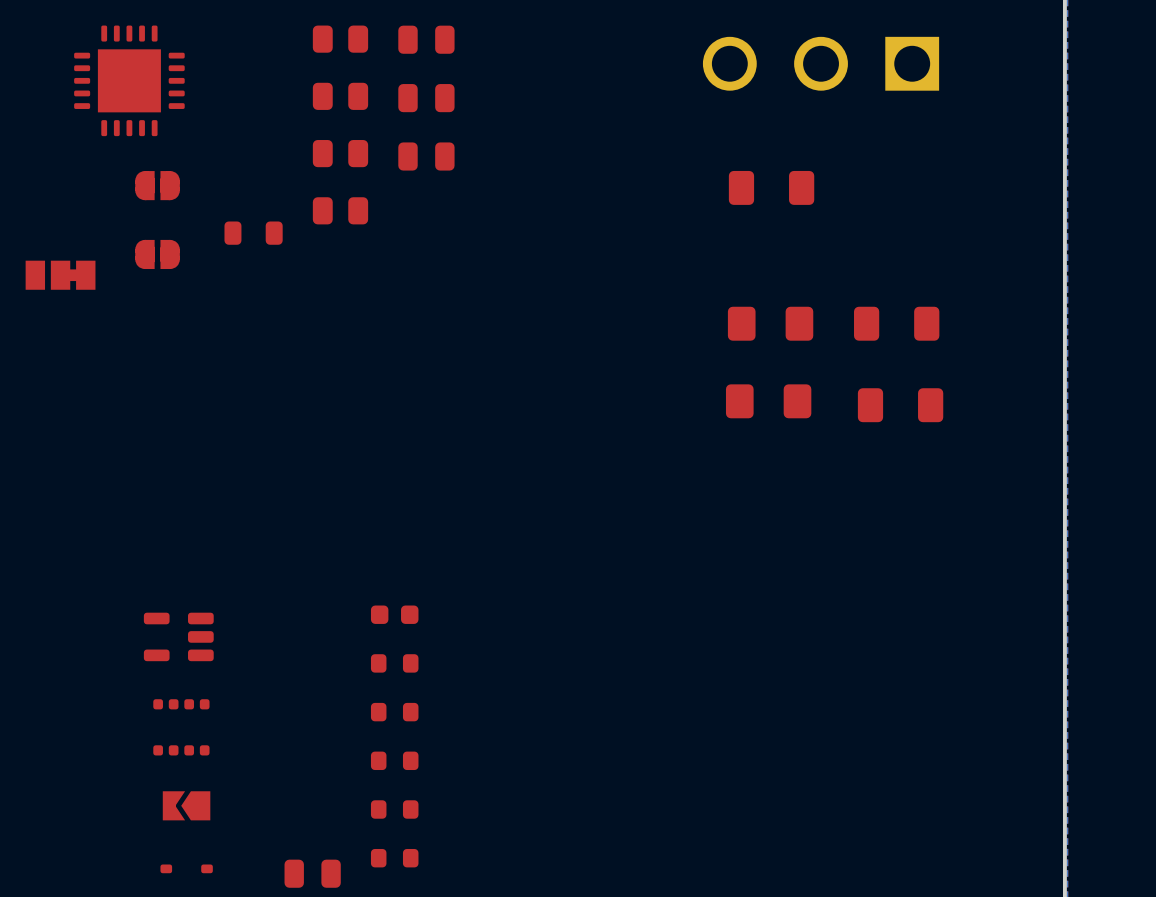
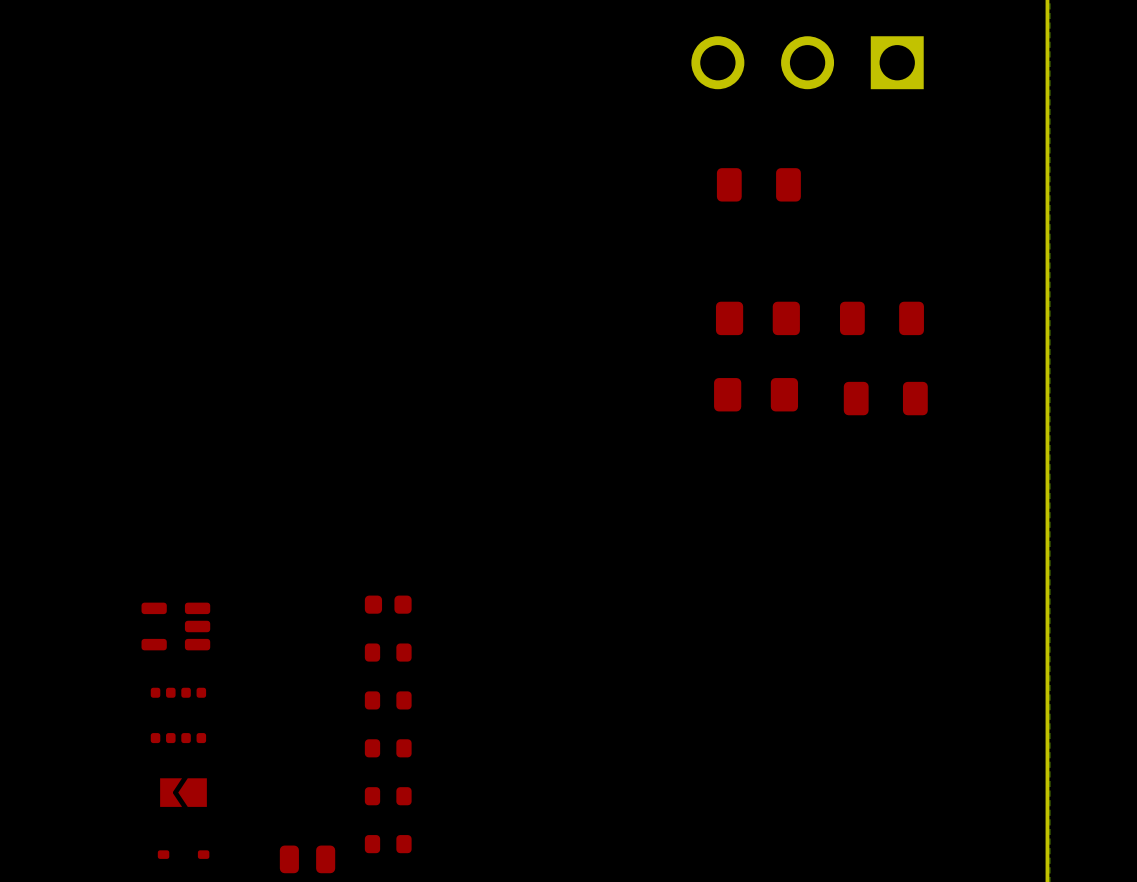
part: (340, 39) -> none
part: (426, 39) -> none
part: (129, 80) -> none
part: (340, 96) -> none
part: (426, 98) -> none
part: (340, 153) -> none
part: (426, 156) -> none
part: (157, 185) -> none
part: (340, 210) -> none
part: (253, 233) -> none
part: (157, 254) -> none
part: (60, 275) -> none

